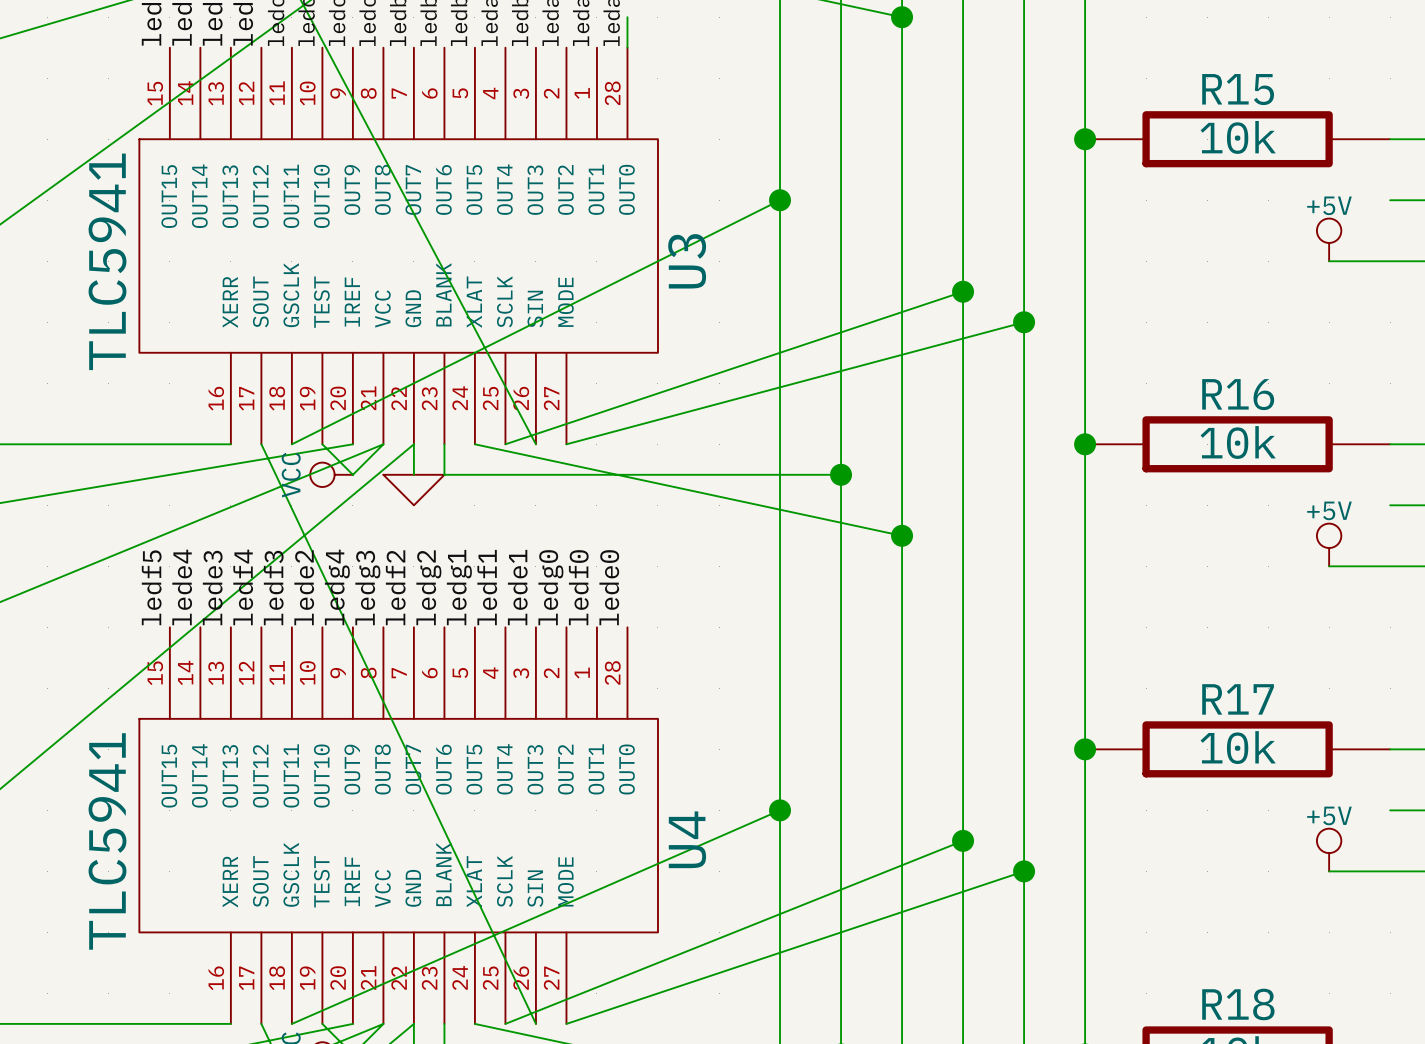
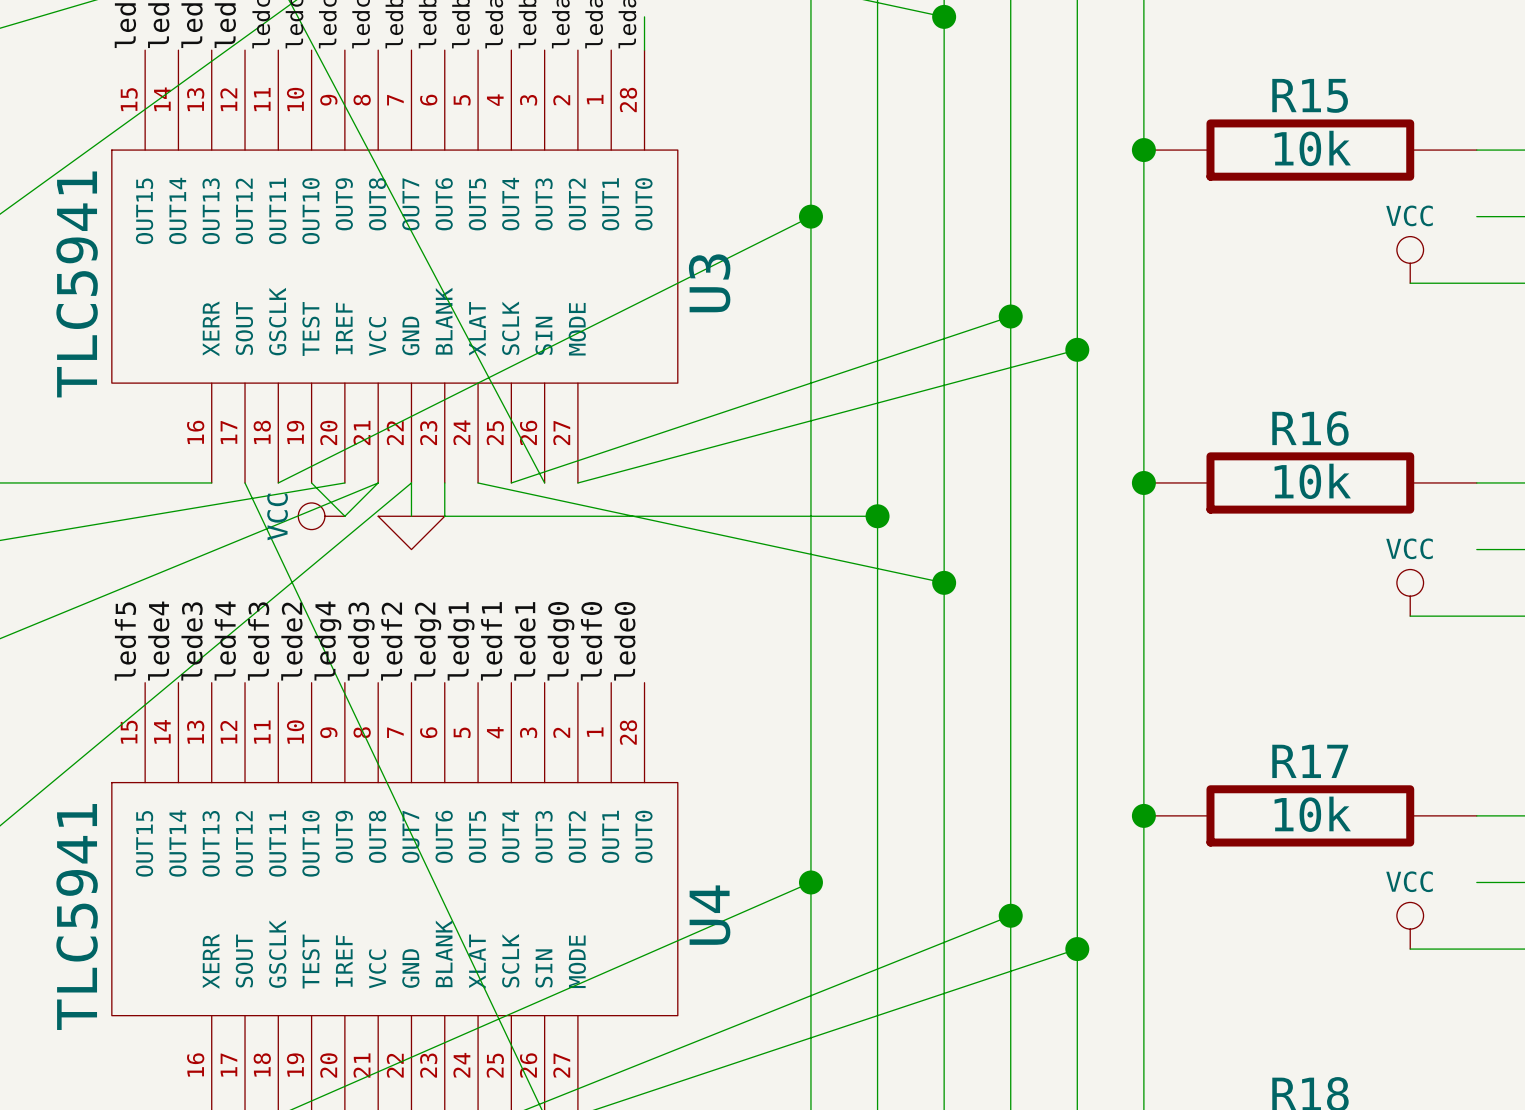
power symbol: +5V (1329, 239) -> VCC (1410, 259)
power symbol: +5V (1329, 544) -> VCC (1410, 592)
power symbol: +5V (1329, 850) -> VCC (1410, 925)

